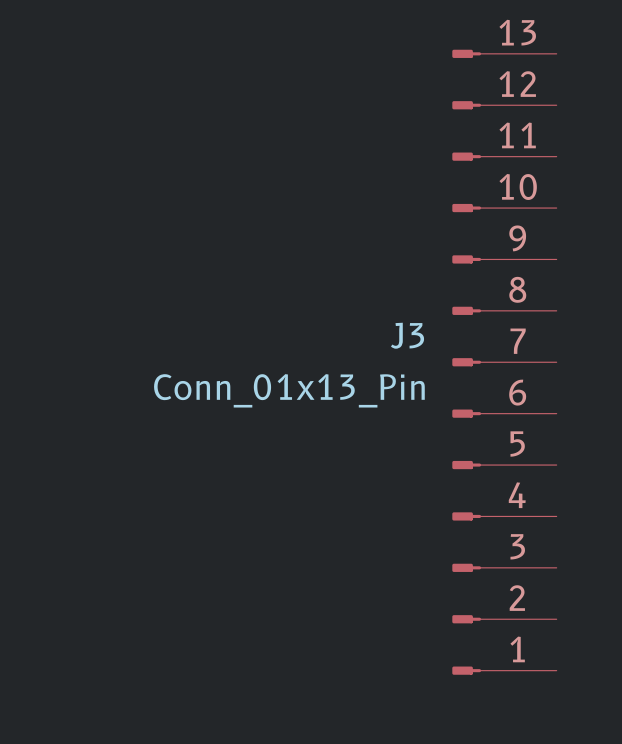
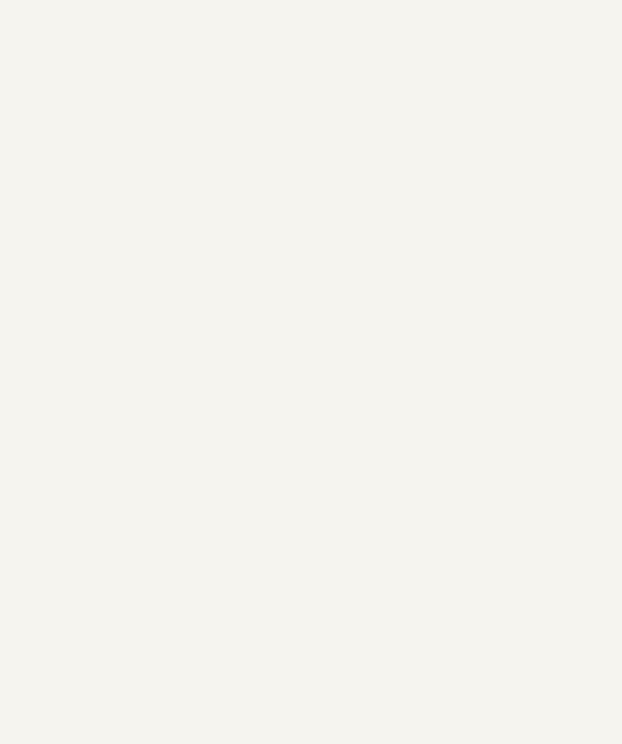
J3: Conn_01x13_Pin (504, 362) -> none

